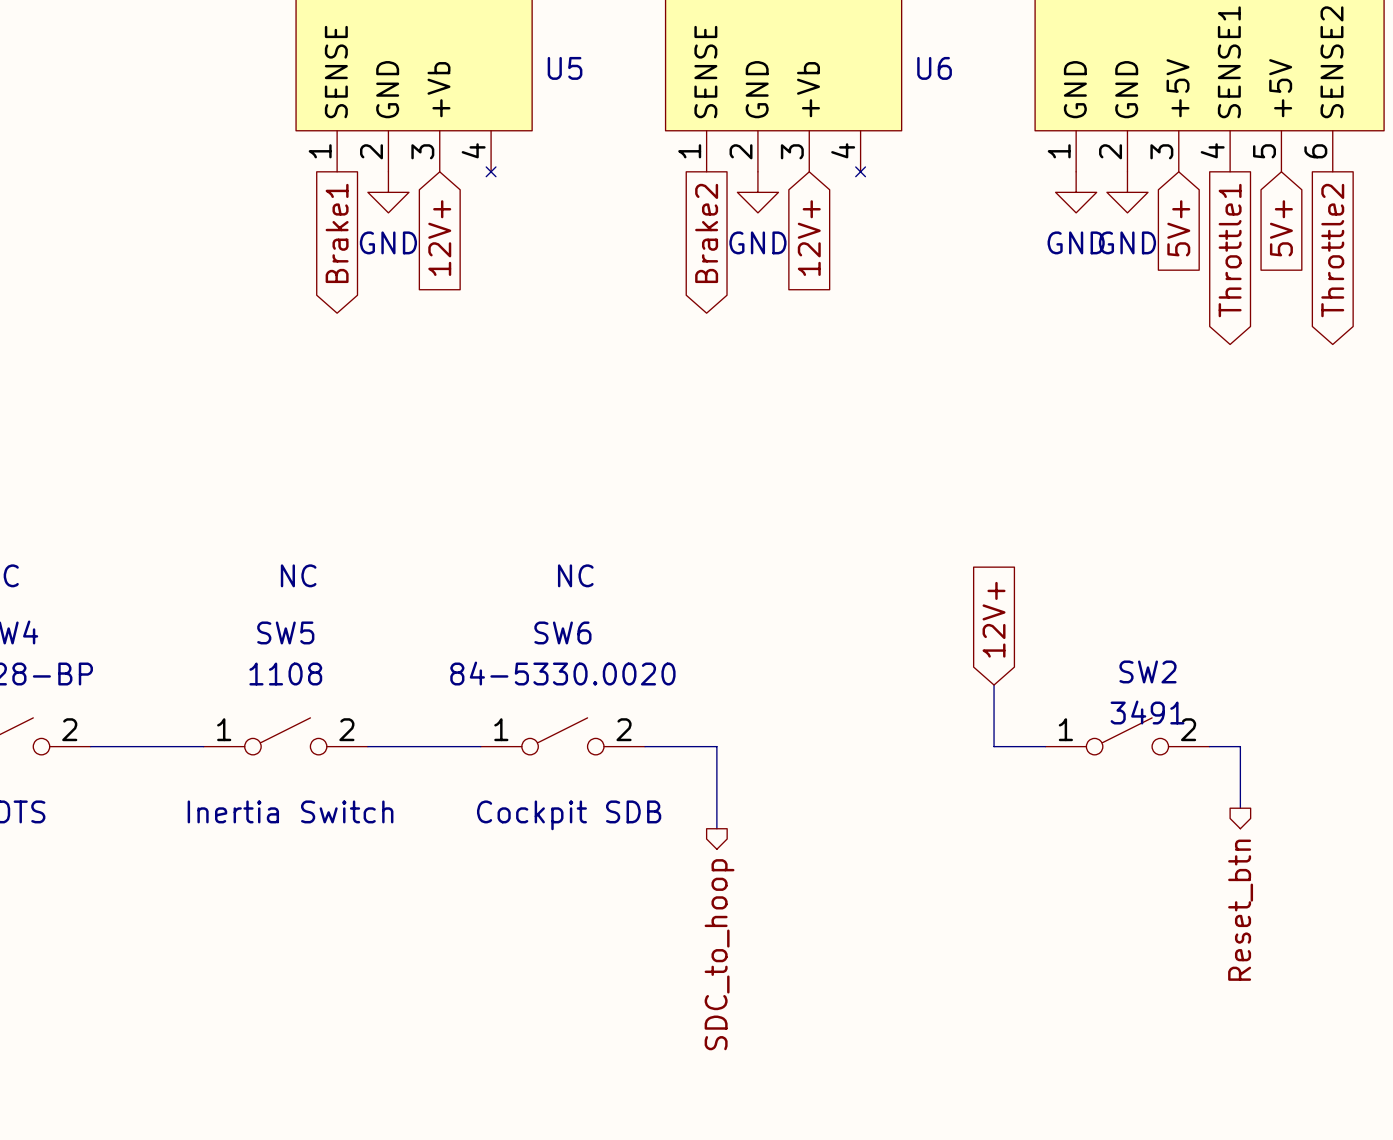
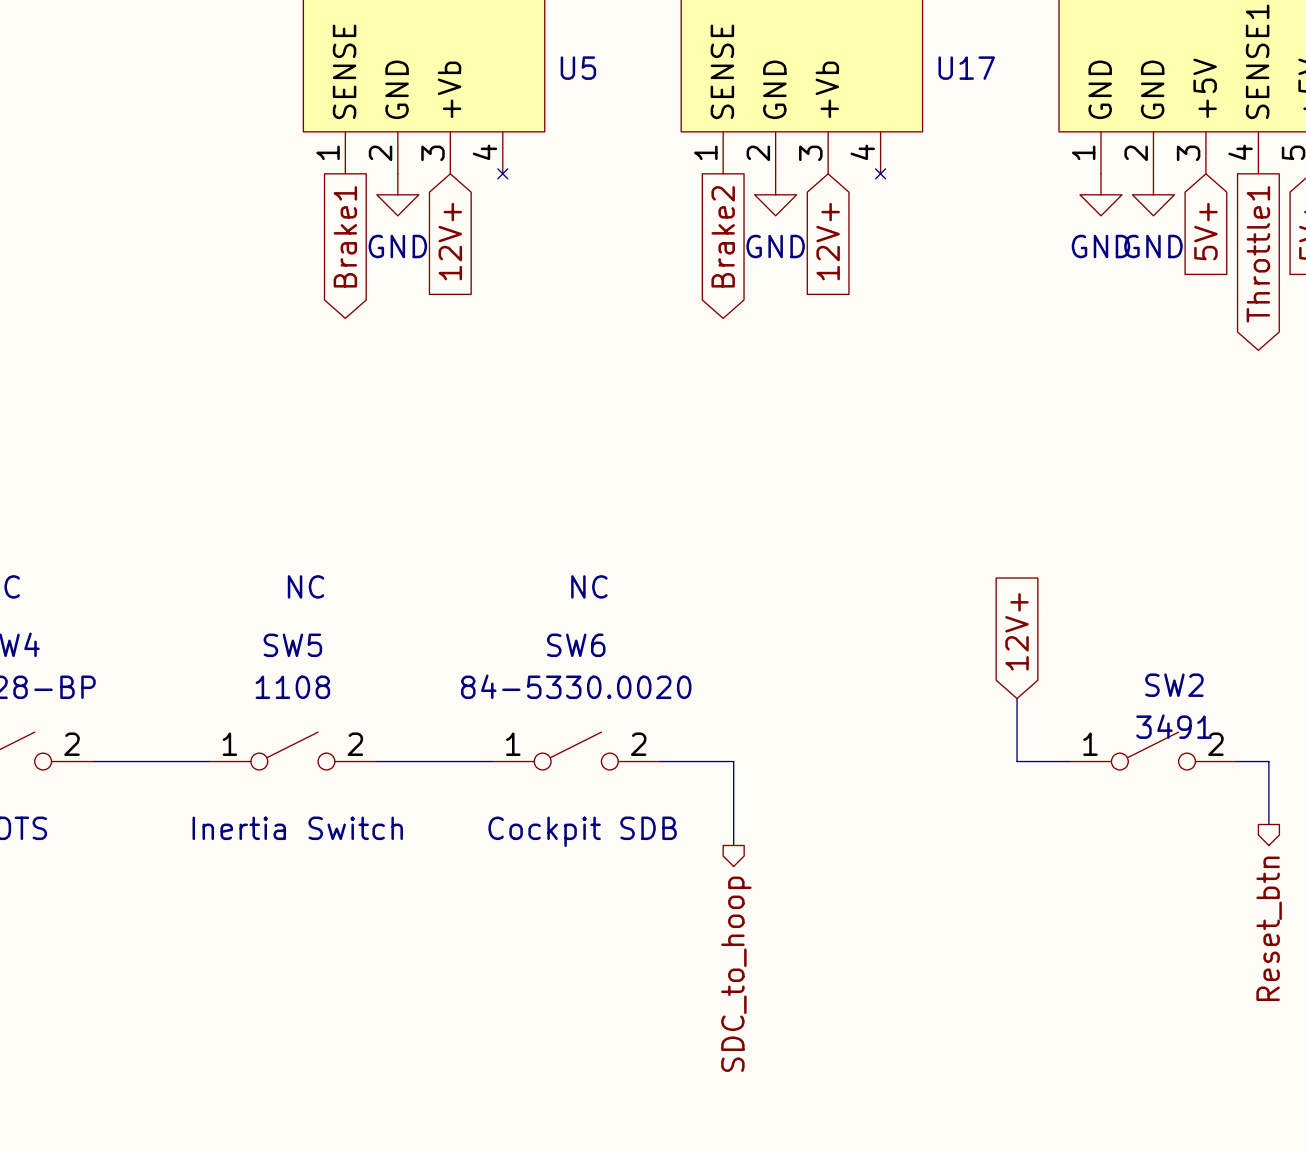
U6 name: U6 (934, 68) -> U17 (966, 68)

